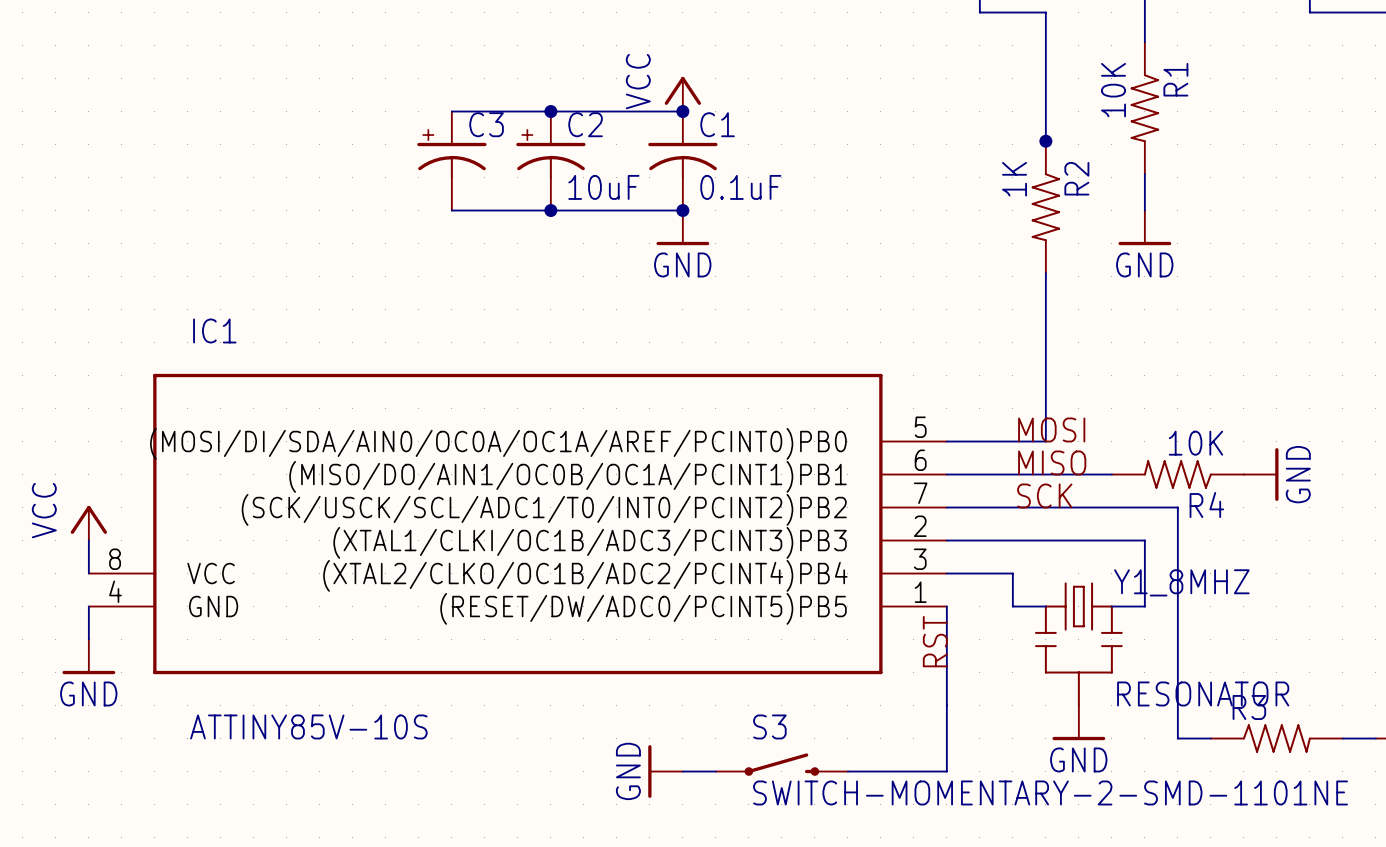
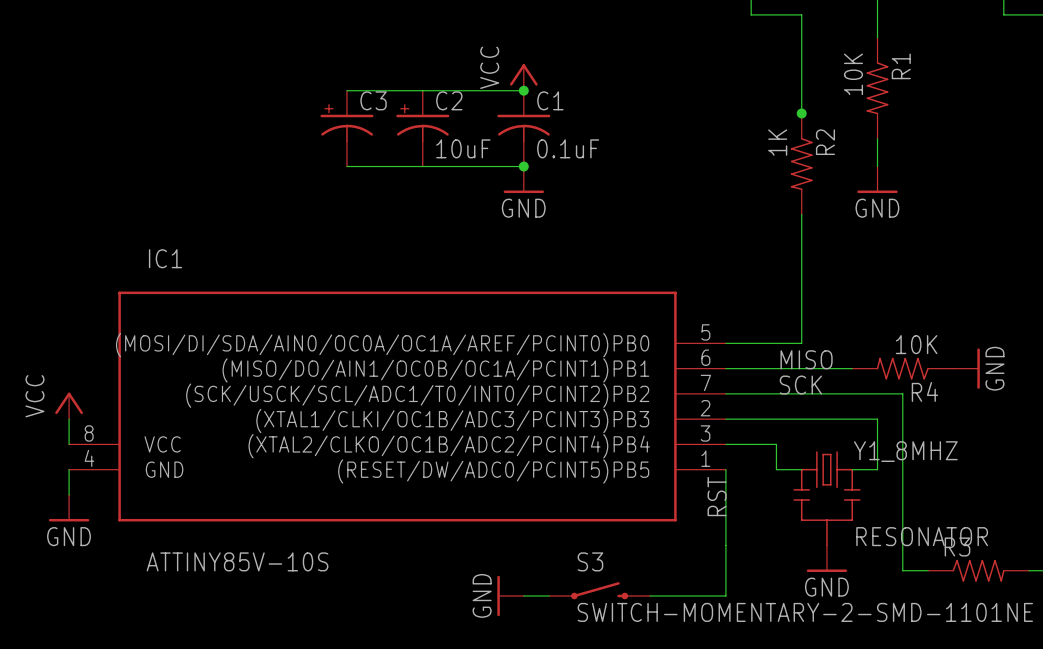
junction: (550, 111) -> none
junction: (550, 210) -> none
label: MOSI (1051, 429) -> none

